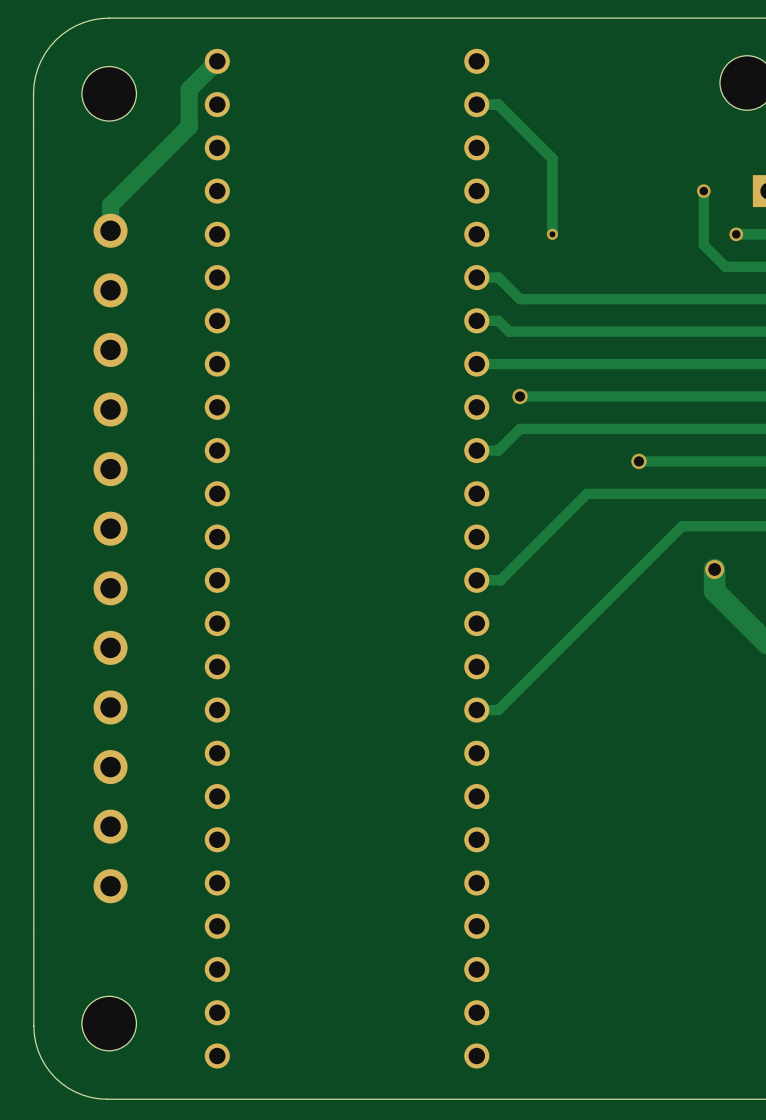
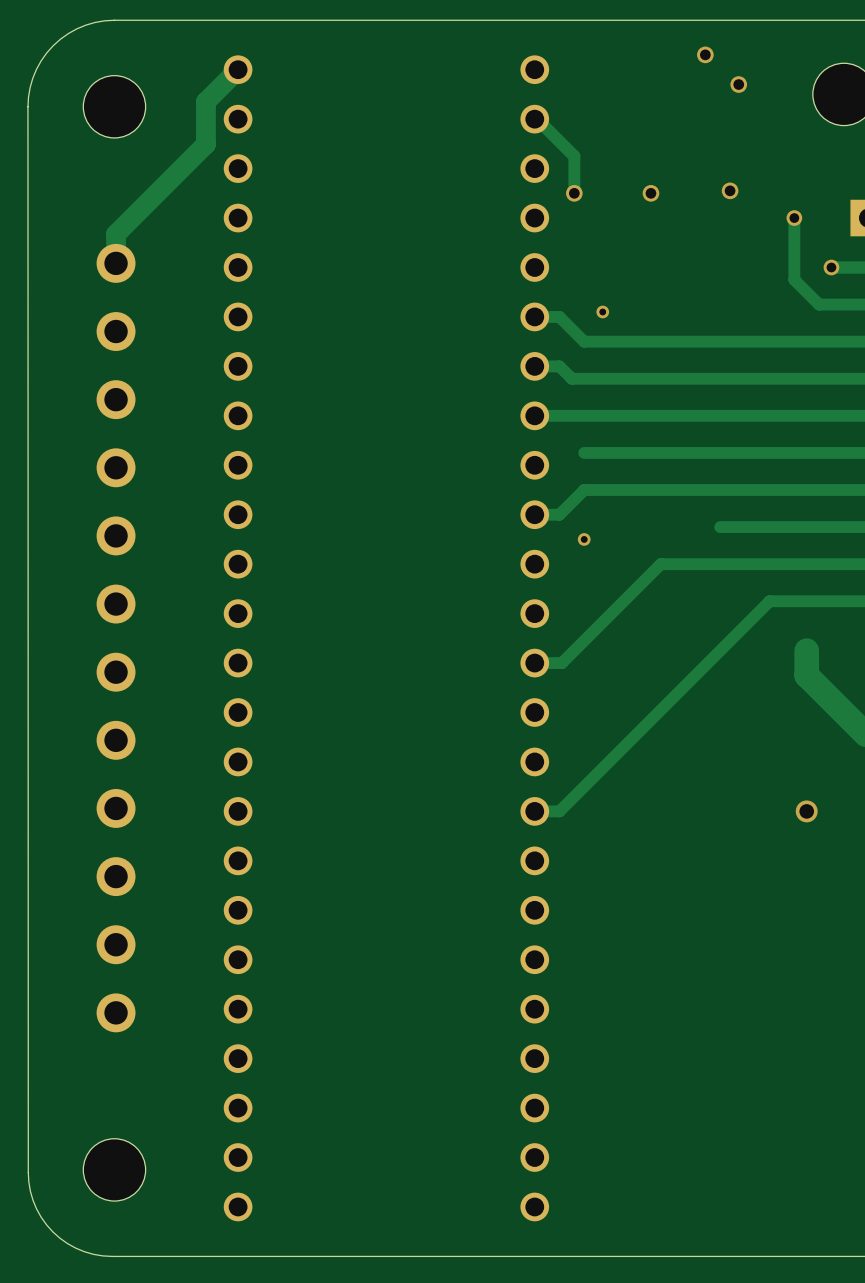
via: none -> (705, 54)
via: none -> (738, 84)
track: (478, 104) (498, 104) (552, 158) (552, 234) -> (537, 119) (574, 156) (574, 193)
via: none -> (730, 190)
via: none -> (574, 193)
via: none -> (650, 193)
via position: (552, 234) -> (602, 311)
via: (520, 396) -> none
via: (638, 461) -> none
via: none -> (584, 539)
via: (714, 569) -> none
via: none -> (806, 811)

